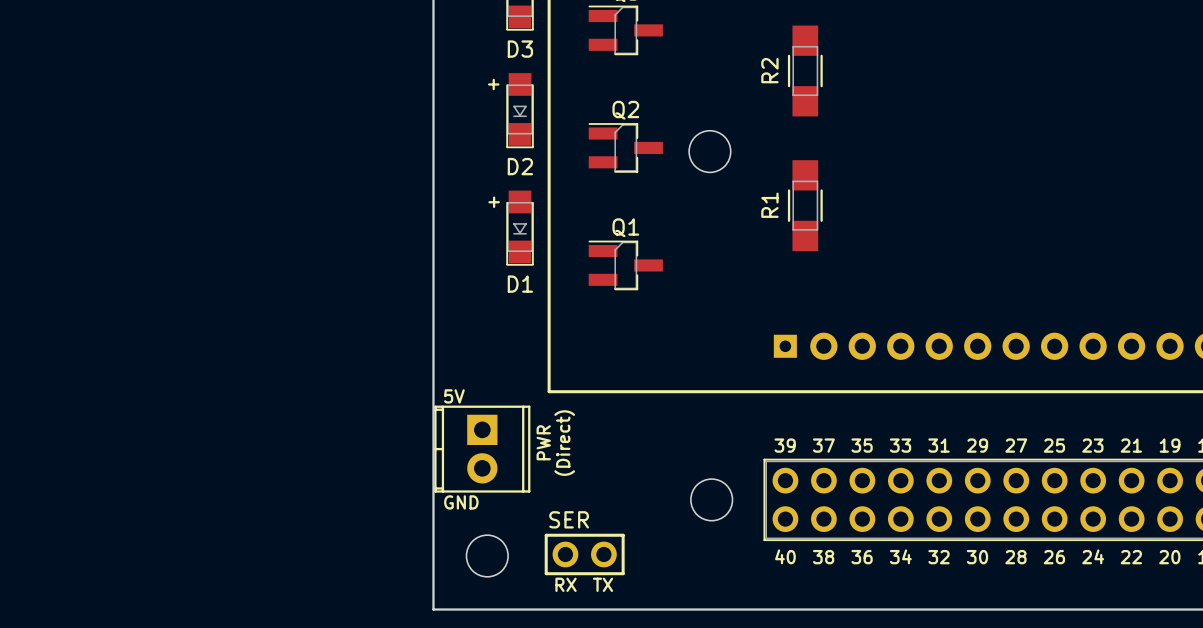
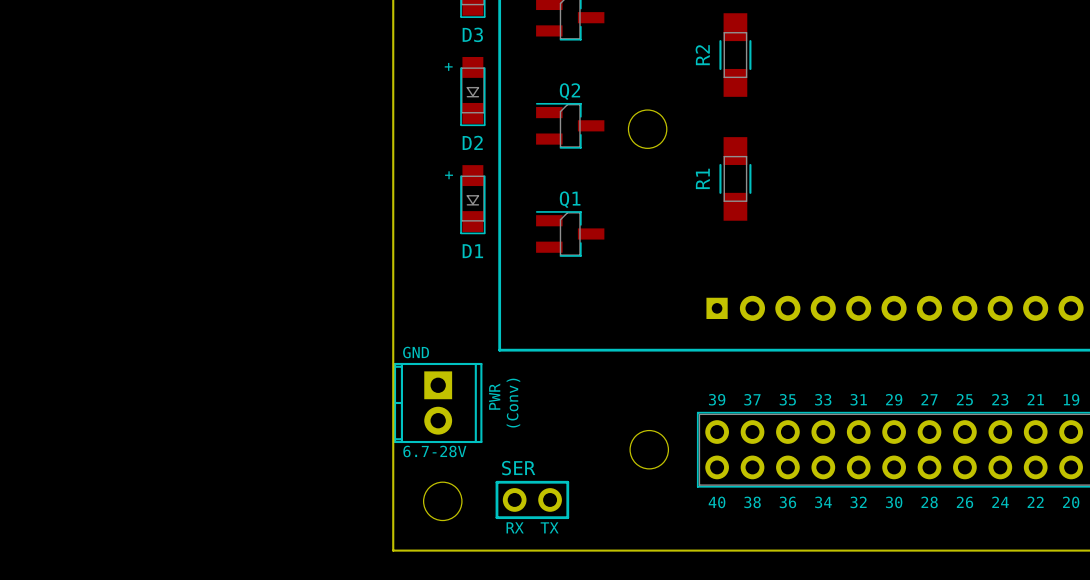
text: 5V (454, 396) -> GND (416, 352)
text: (Direct) (564, 443) -> (Conv) (513, 403)
text: GND (461, 502) -> 6.7-28V (434, 451)

